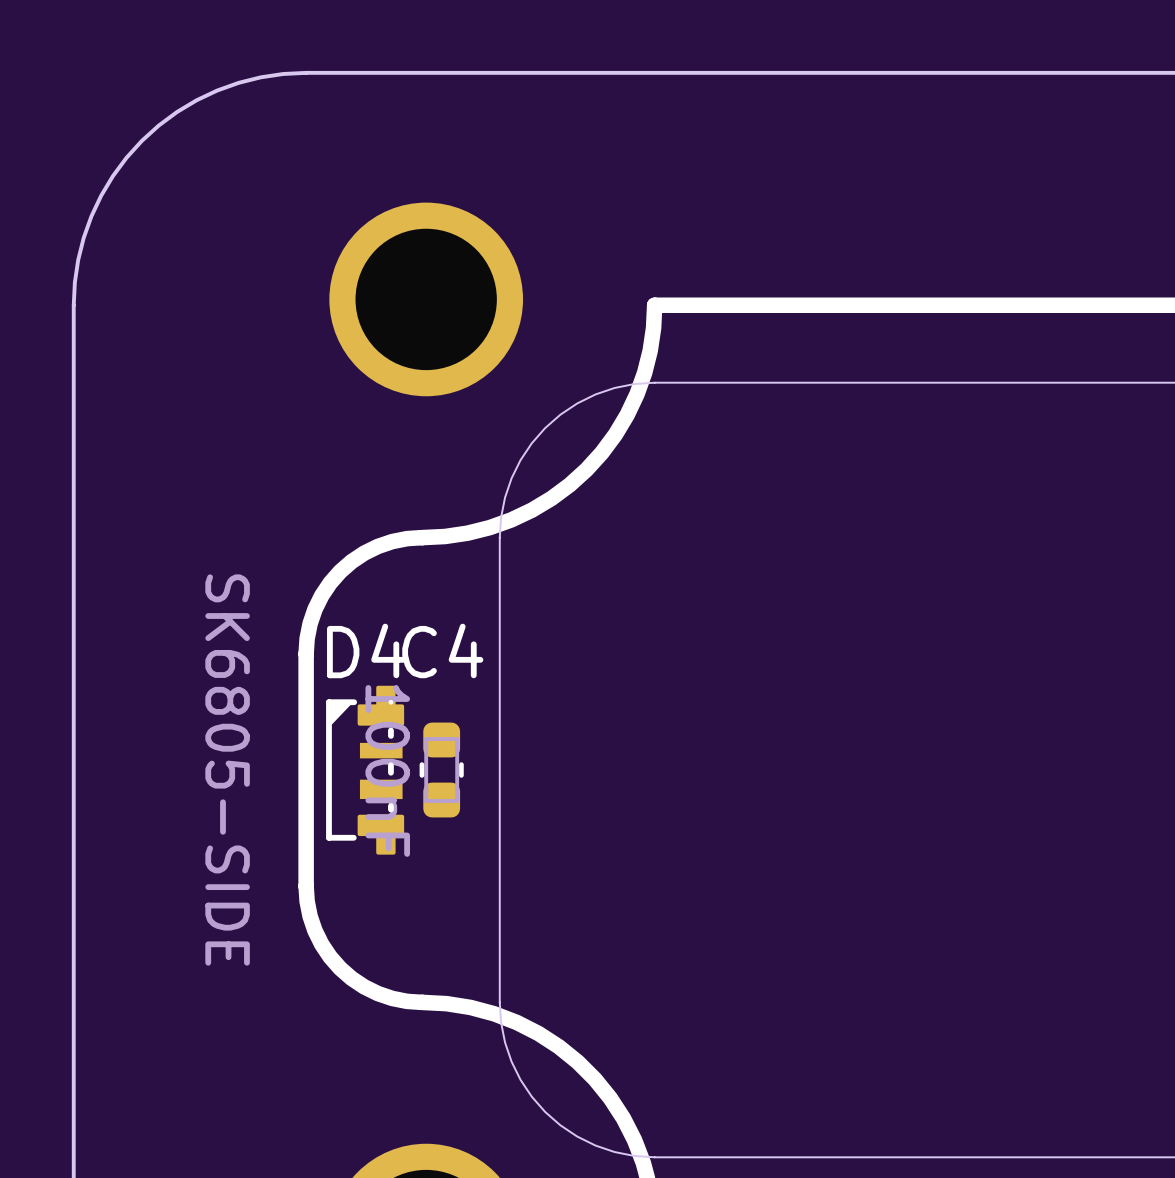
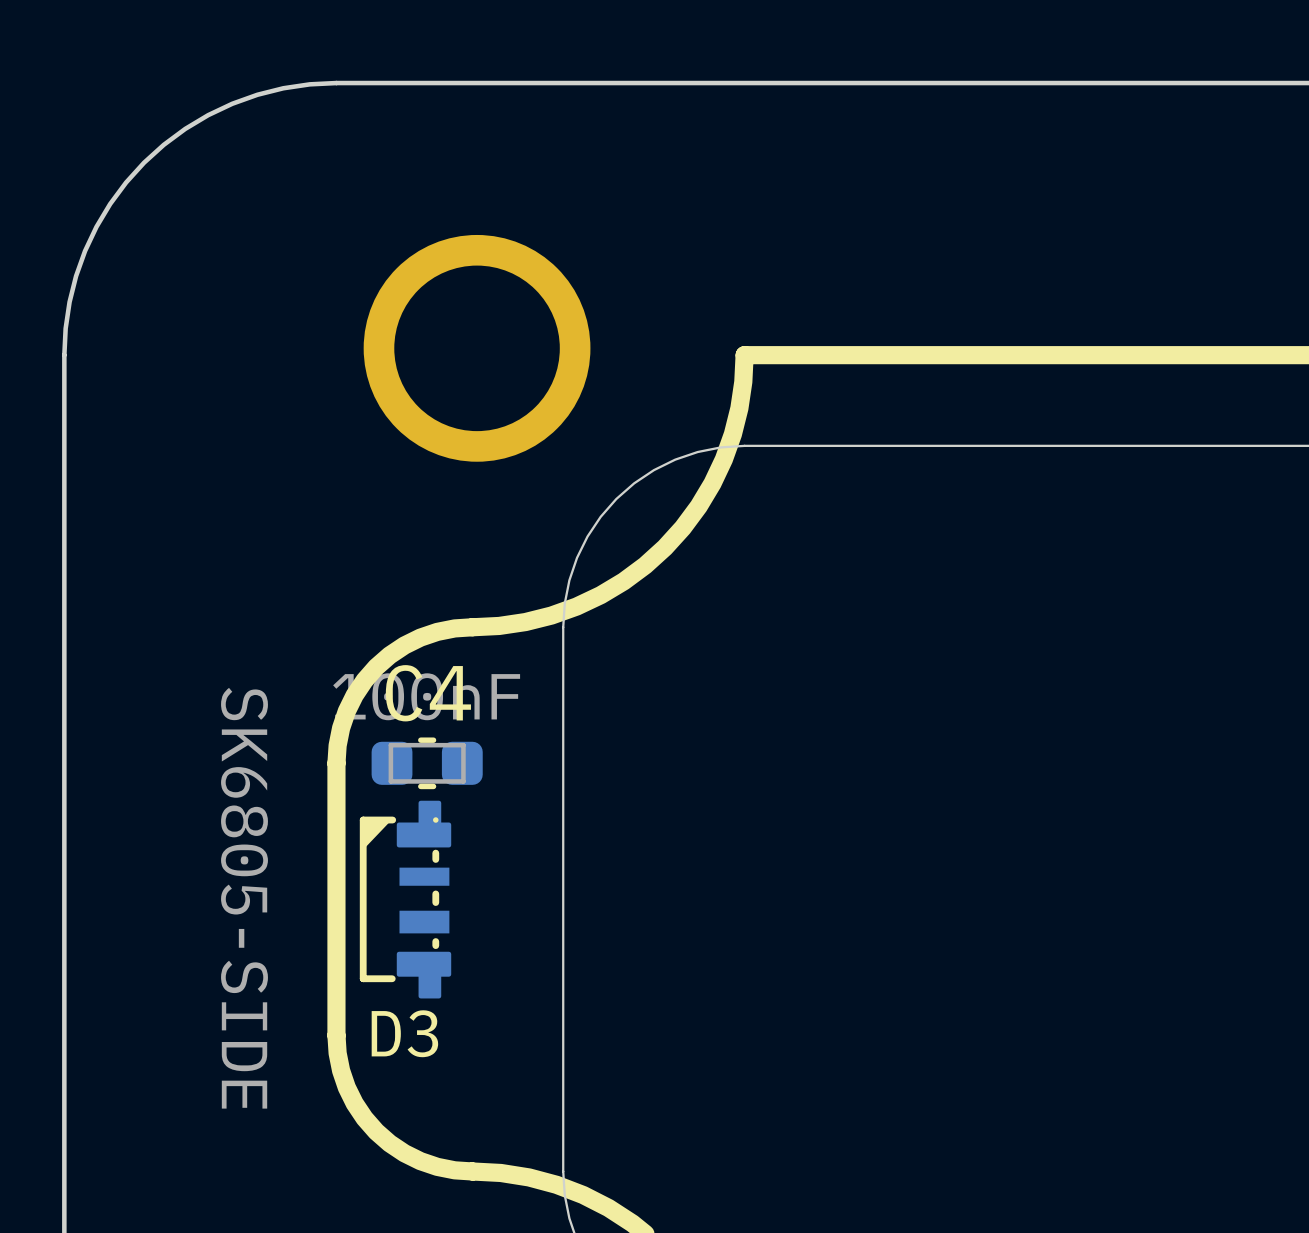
D4 name: D4 (366, 650) -> D3 (404, 1033)
C4 rotation: 0° (441, 770) -> 90° clockwise (427, 763)
C4 position: (441, 770) -> (427, 763)

